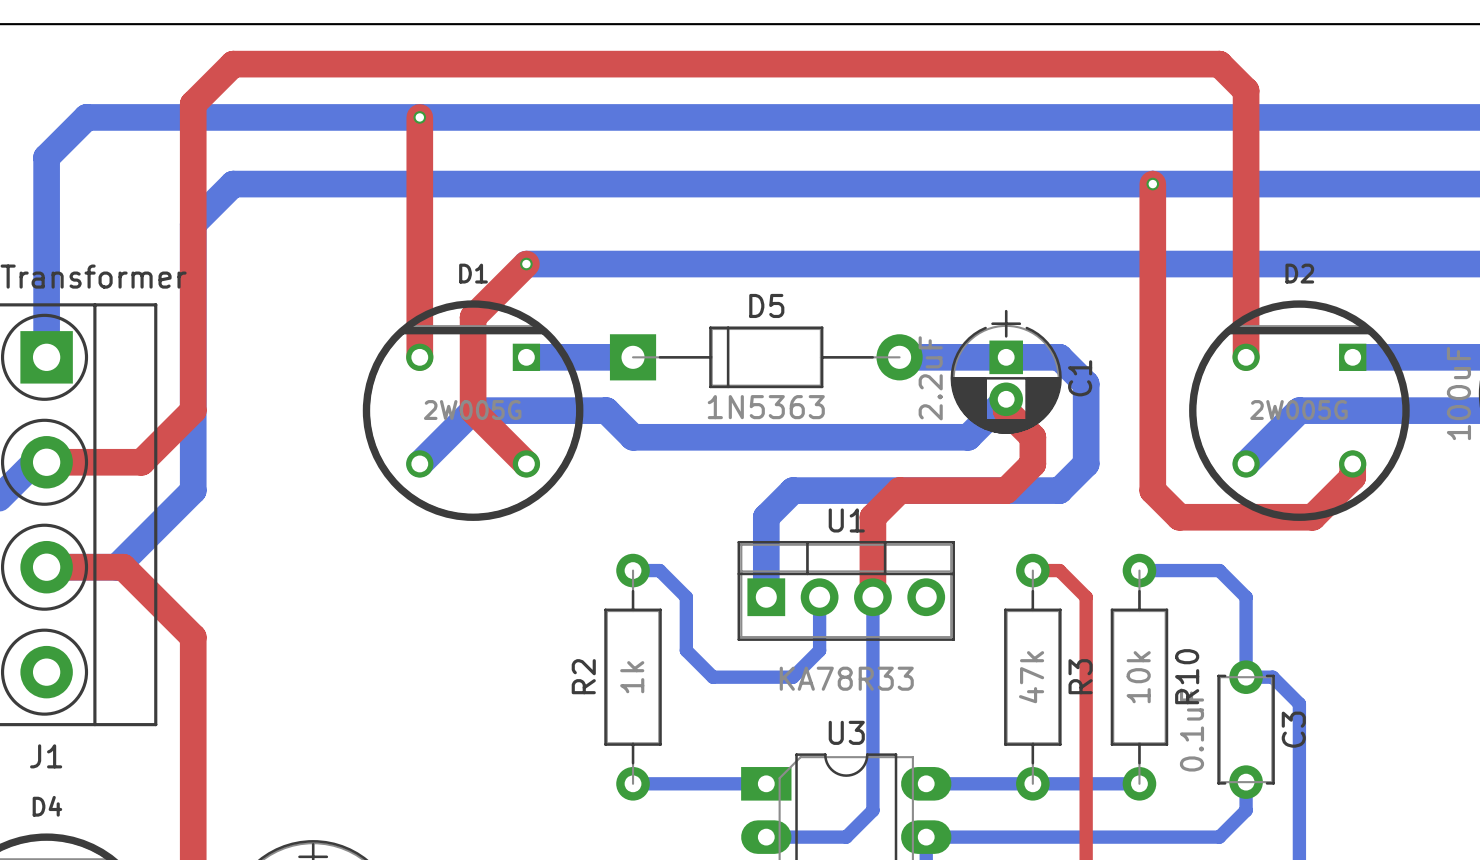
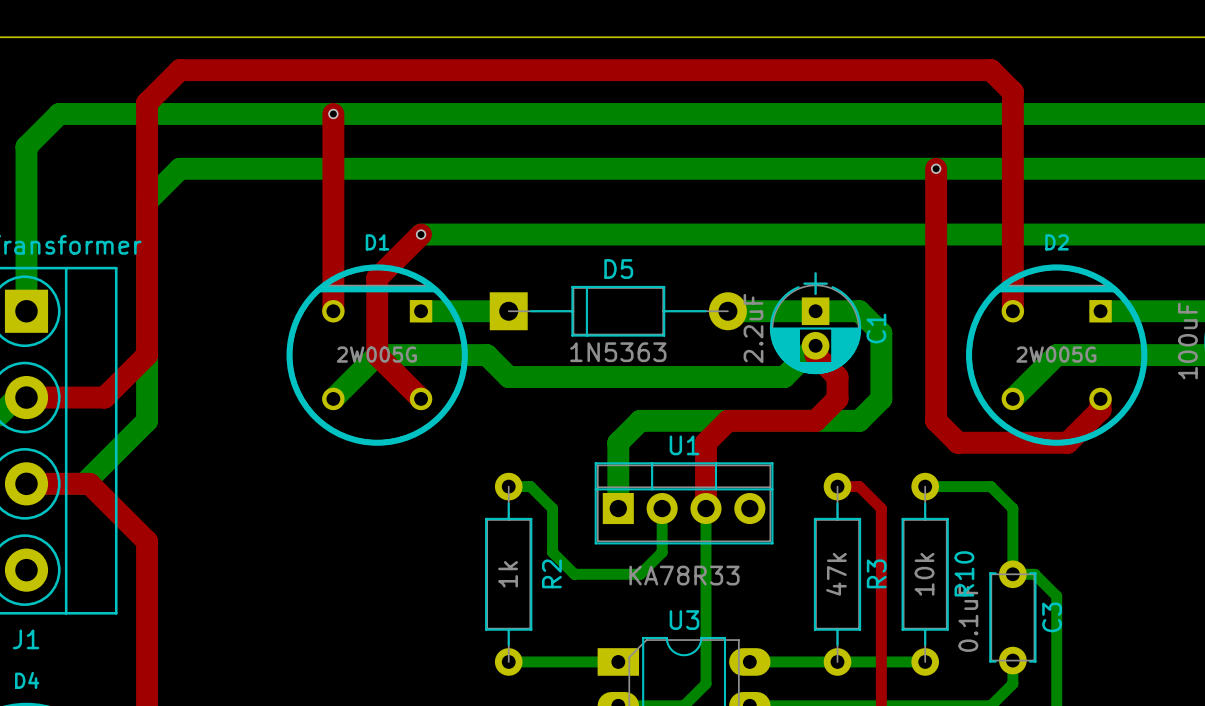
R2 name position: R2 (583, 676) -> R2 (551, 573)

